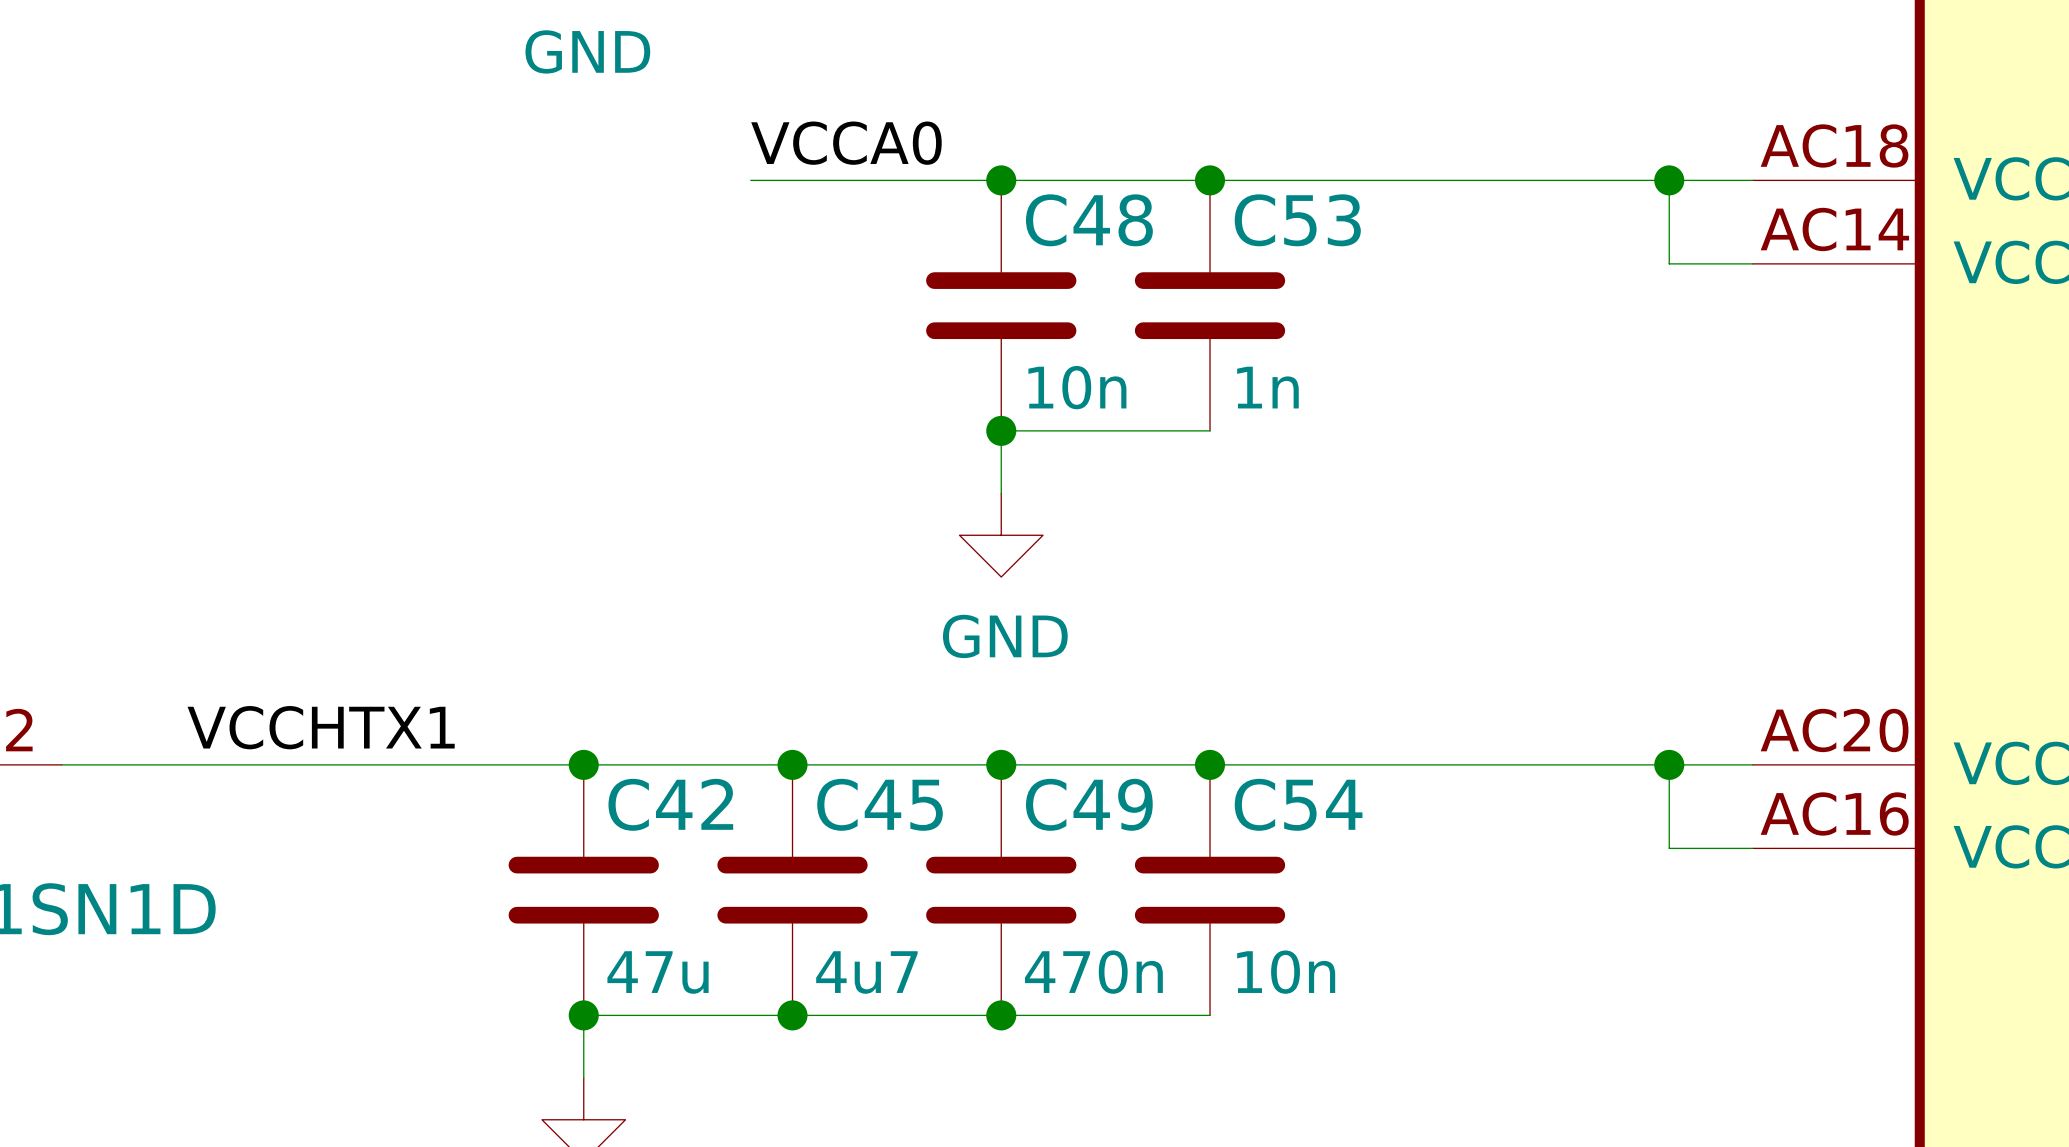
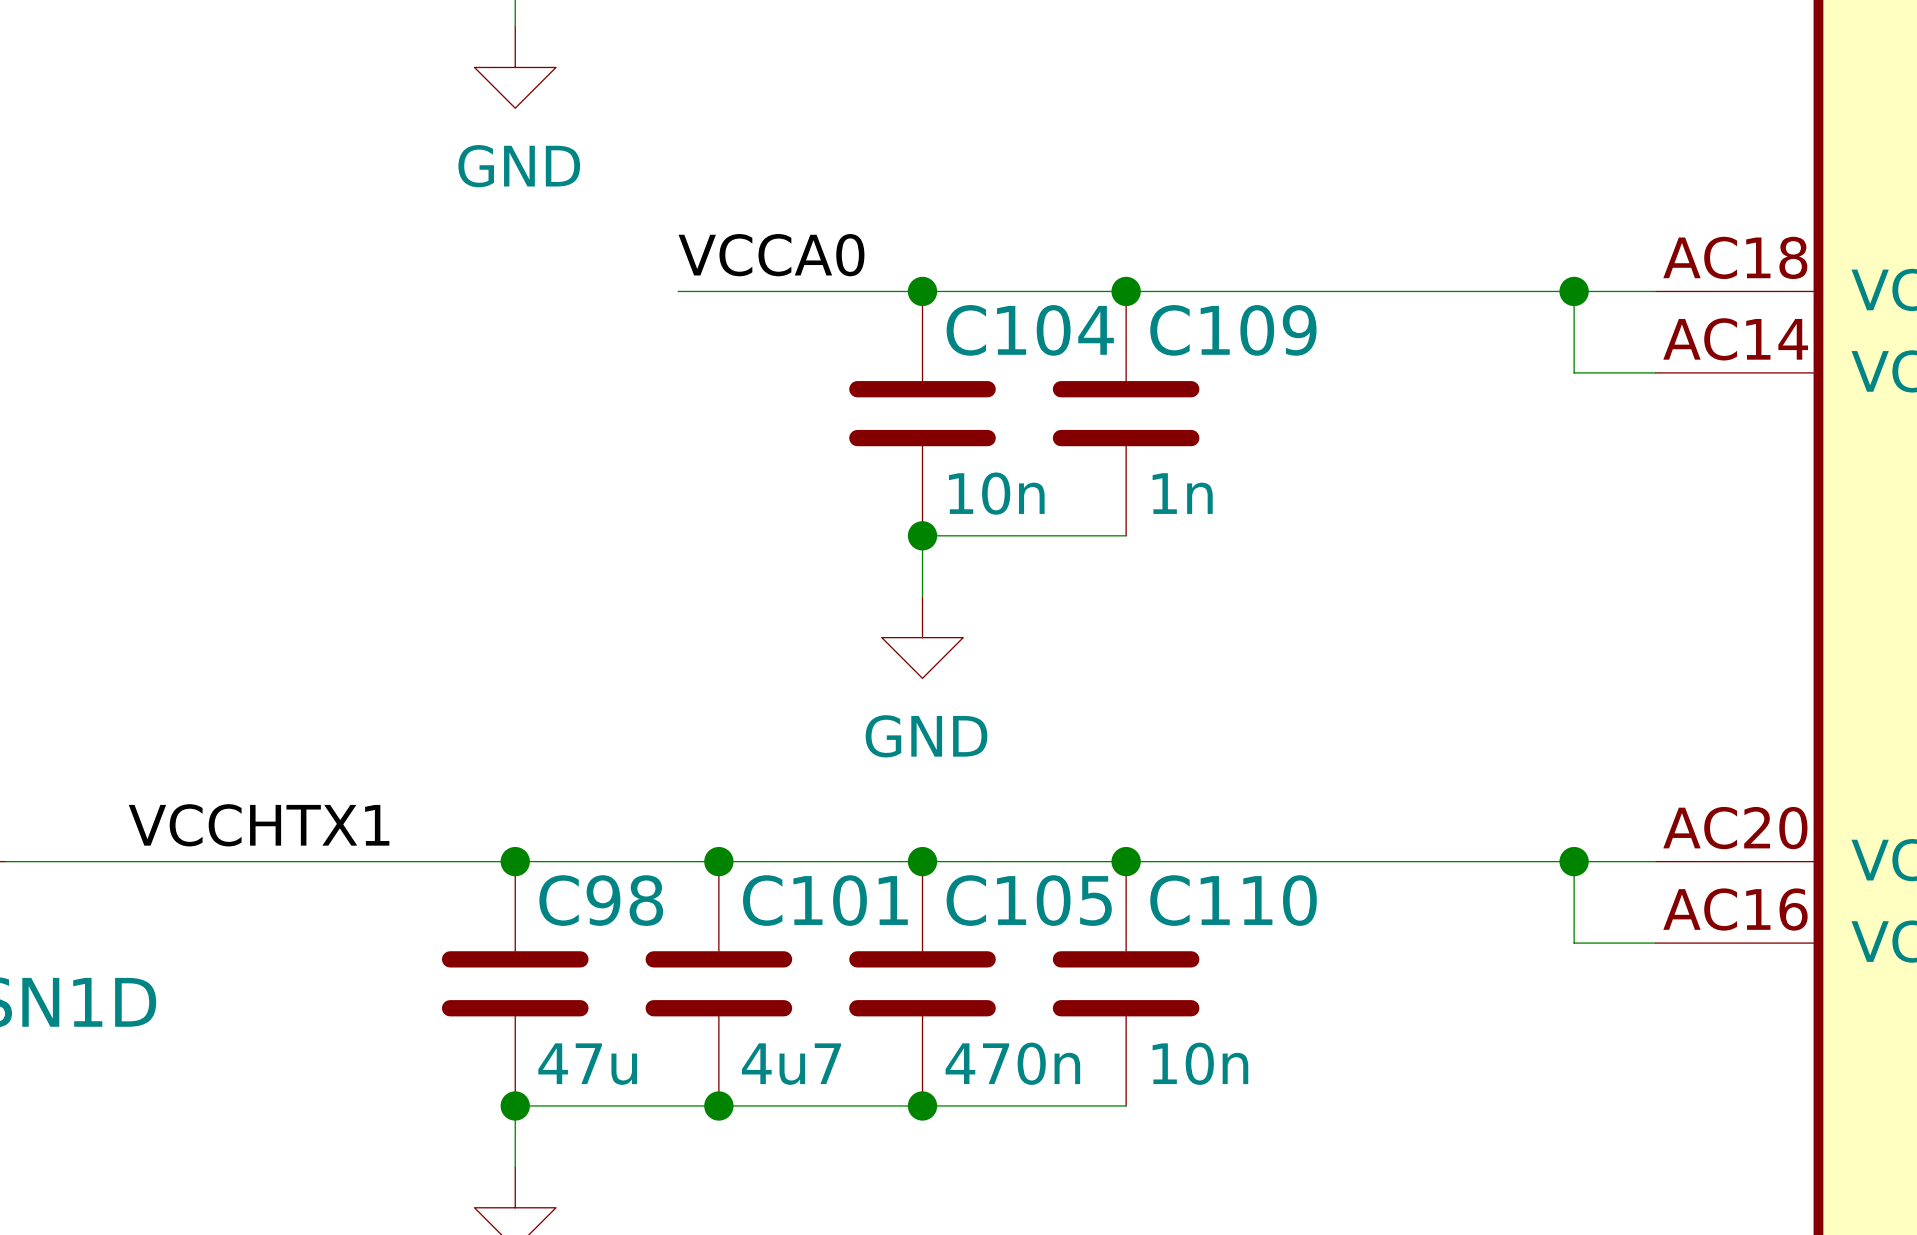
C48 name: C48 (1089, 220) -> C104 (1030, 330)
C53 name: C53 (1297, 220) -> C109 (1233, 330)
C42 name: C42 (670, 804) -> C98 (601, 900)
C45 name: C45 (880, 804) -> C101 (825, 900)
C49 name: C49 (1089, 804) -> C105 (1029, 900)
C54 name: C54 (1298, 804) -> C110 (1233, 900)

